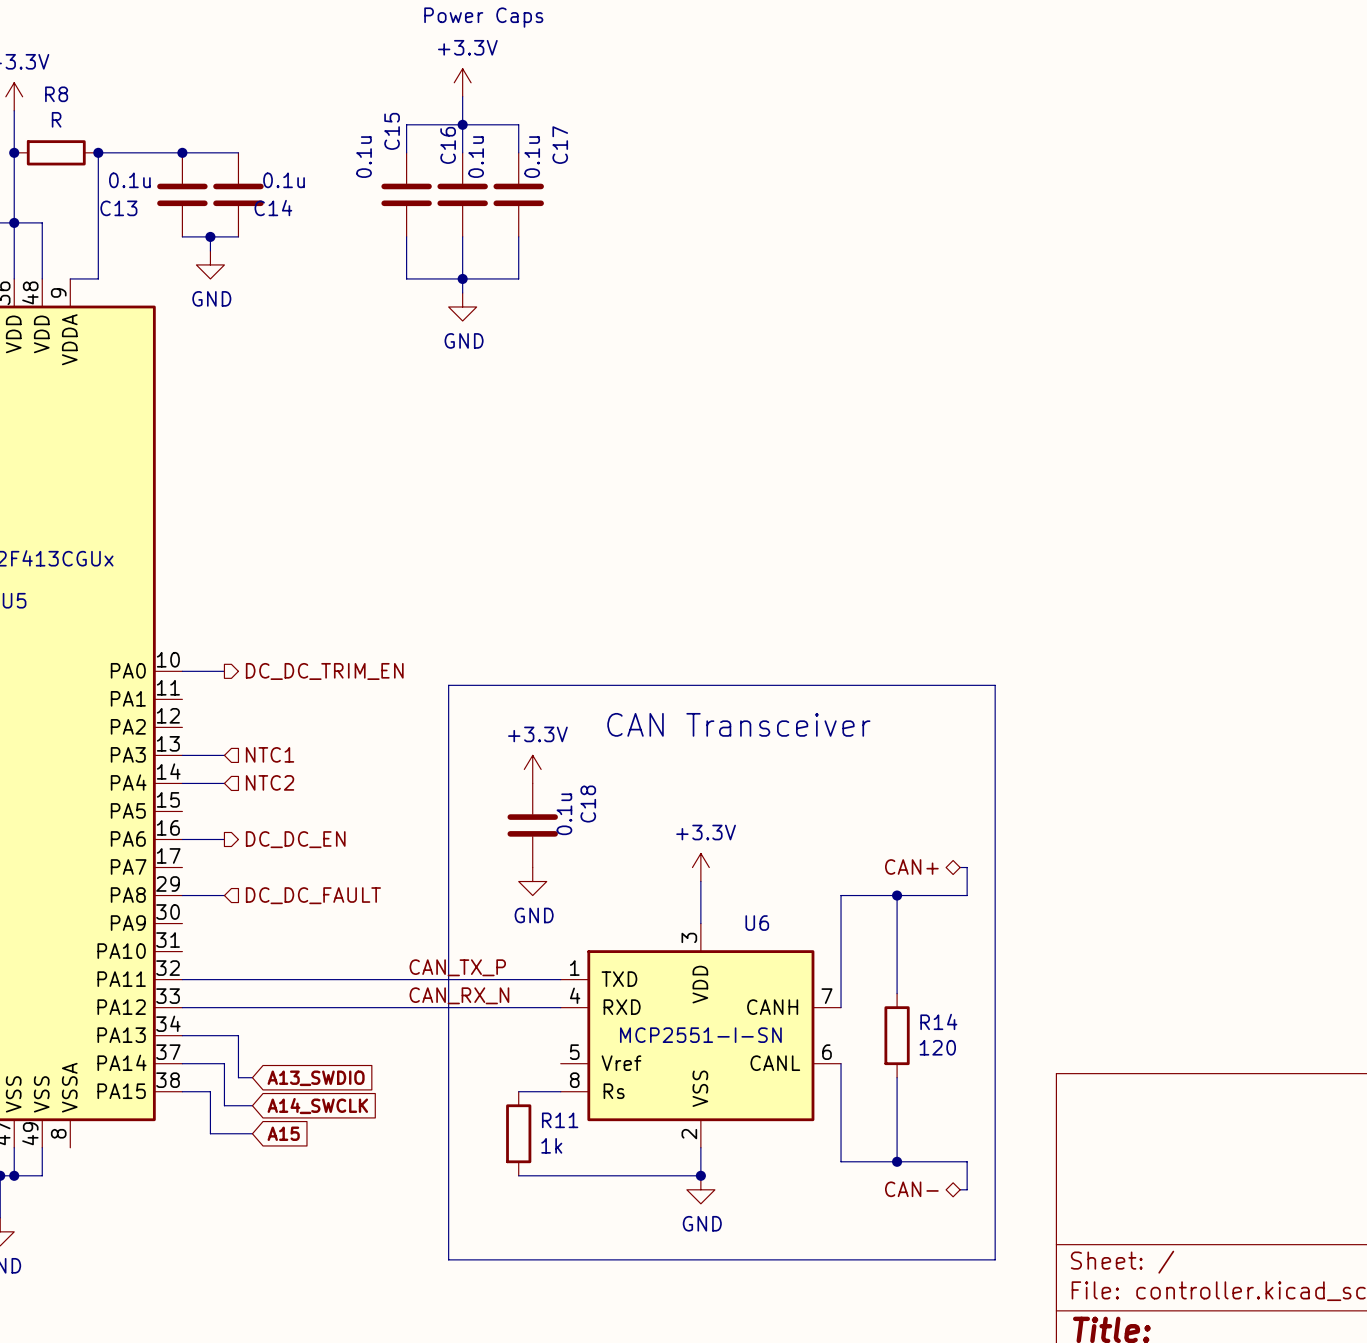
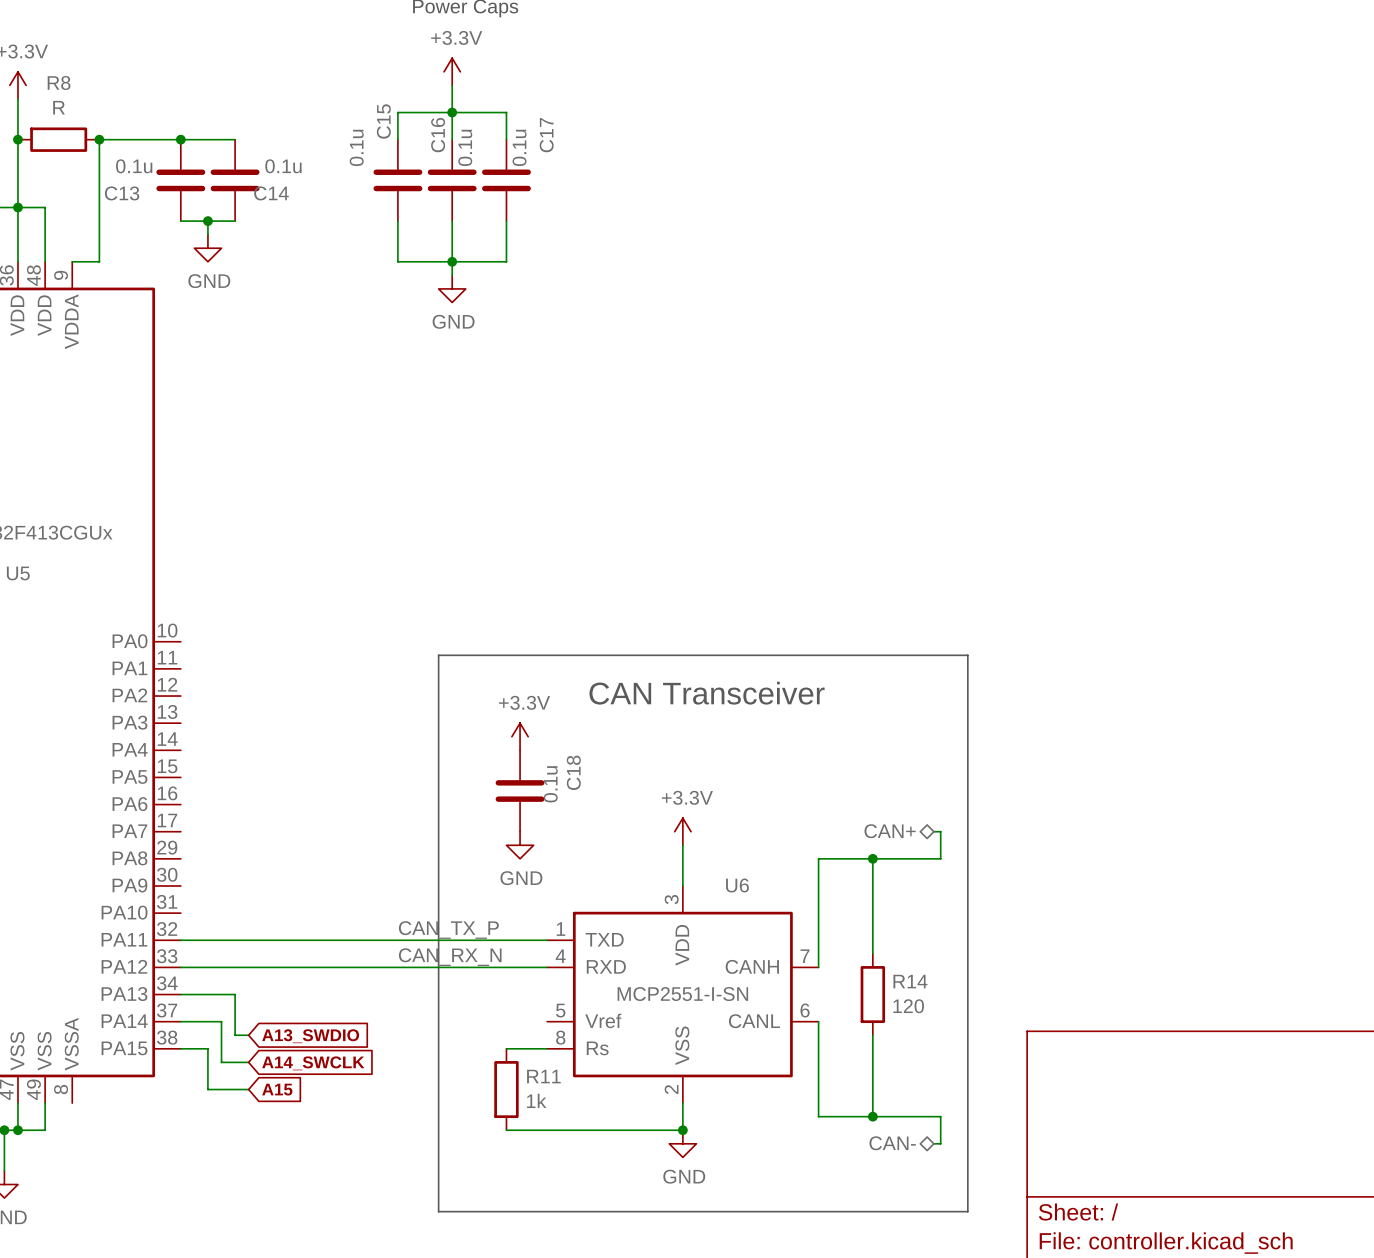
wire: (182, 671) (224, 671) -> none
hierarchical label: DC_DC_TRIM_EN (324, 671) -> none
hierarchical label: NTC1 (270, 754) -> none
wire: (182, 755) (224, 755) -> none
hierarchical label: NTC2 (270, 782) -> none
wire: (182, 783) (224, 783) -> none
wire: (182, 839) (224, 839) -> none
hierarchical label: DC_DC_EN (295, 839) -> none
wire: (182, 895) (224, 895) -> none
hierarchical label: DC_DC_FAULT (313, 895) -> none

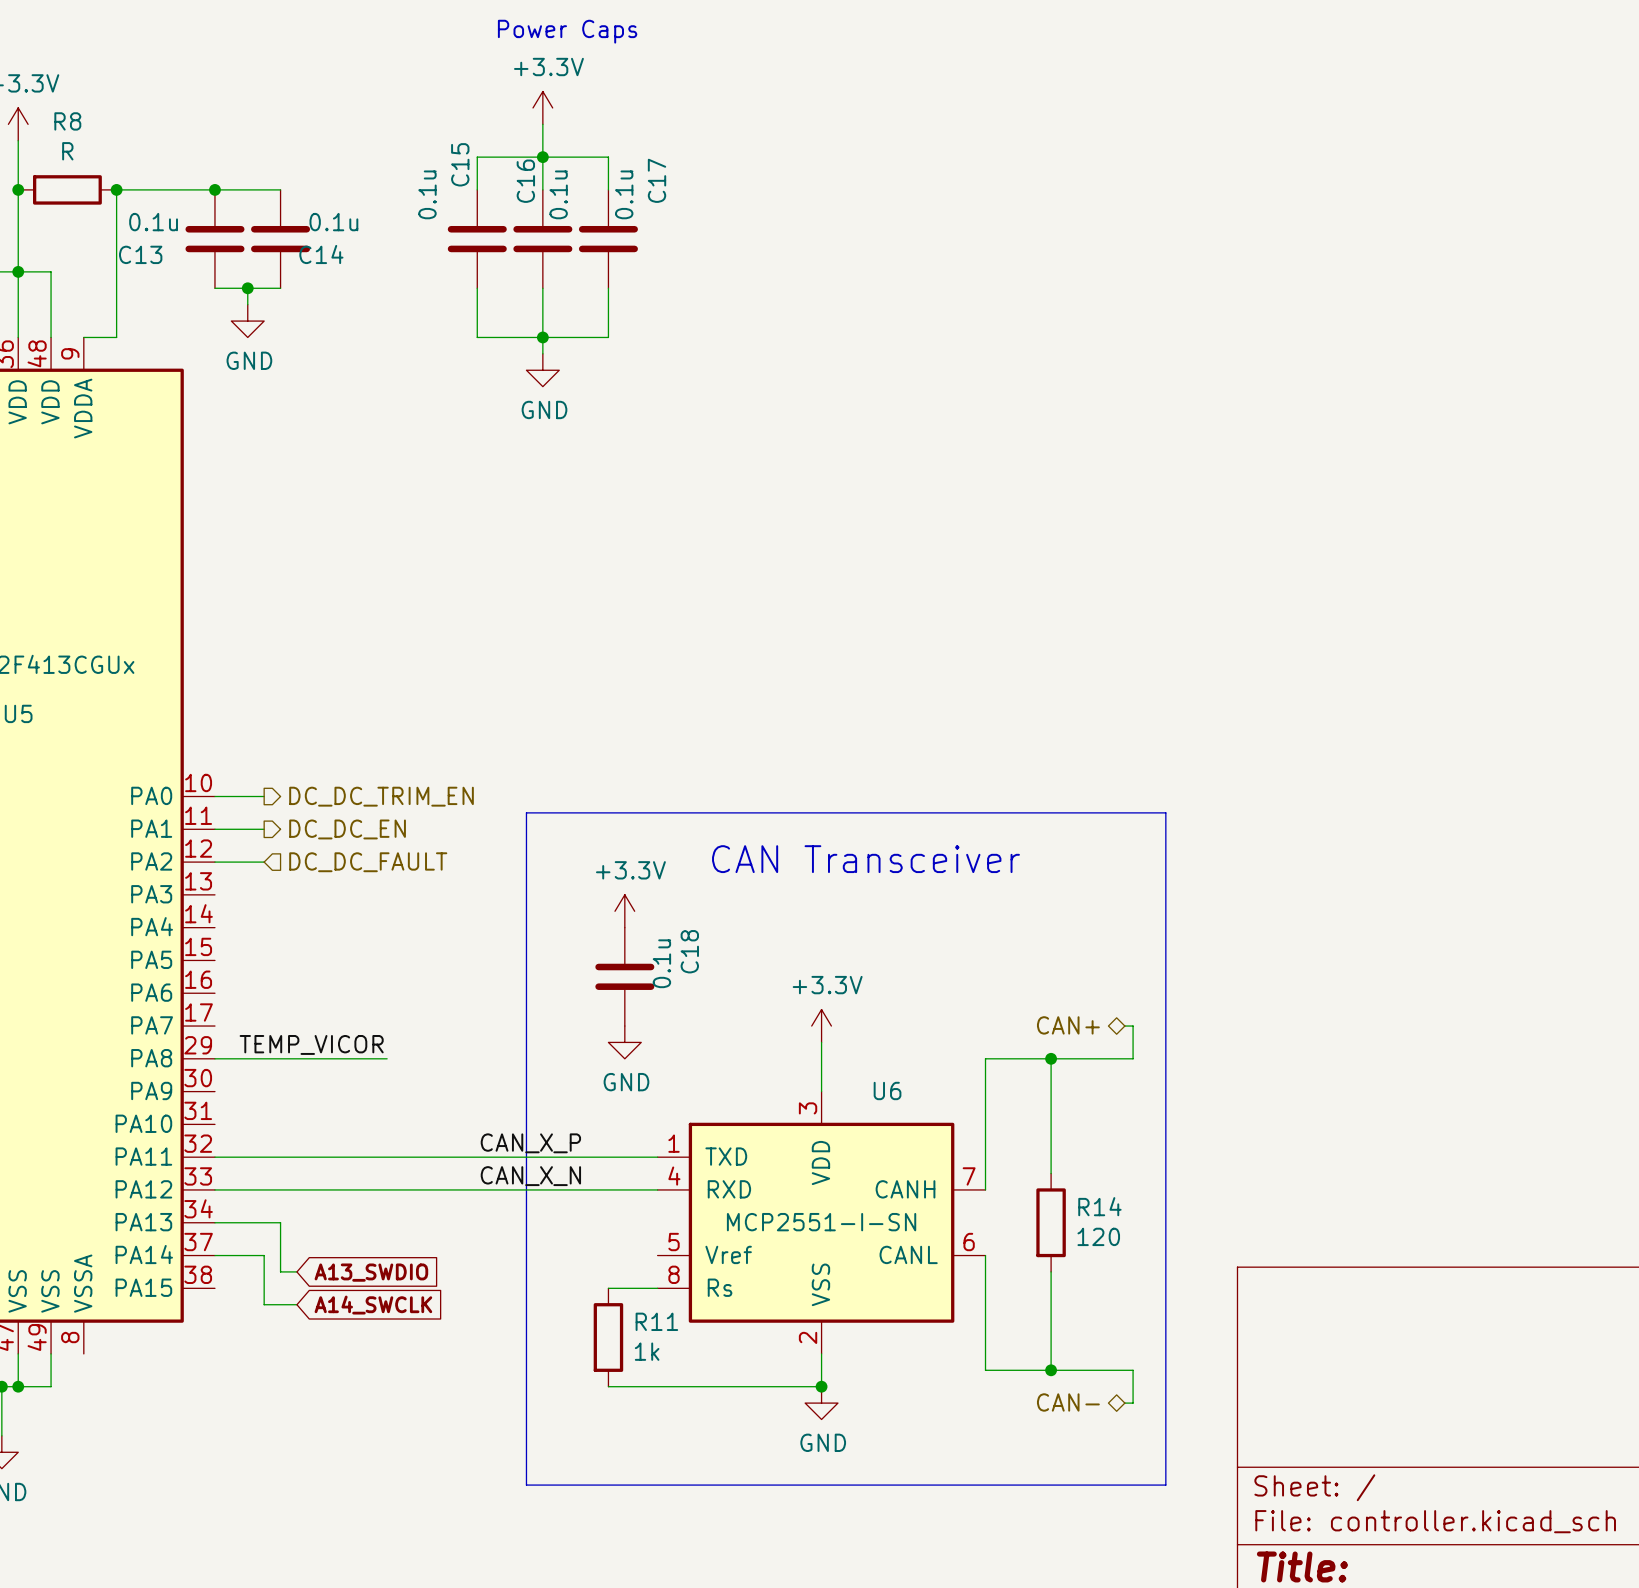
wire: none -> (214, 796) (264, 796)
hierarchical label: none -> DC_DC_TRIM_EN (381, 796)
wire: none -> (214, 829) (264, 829)
hierarchical label: none -> DC_DC_EN (347, 829)
wire: none -> (214, 862) (264, 862)
hierarchical label: none -> DC_DC_FAULT (368, 862)
label: none -> TEMP_VICOR (311, 1044)
wire: none -> (214, 1058) (387, 1058)
label: CAN_TX_P (448, 930) -> CAN_X_P (530, 1143)
label: CAN_RX_N (450, 957) -> CAN_X_N (530, 1176)
wire: (180, 1048) (207, 1048) (207, 1089) (248, 1089) -> none
global label: A15 (277, 1089) -> none

